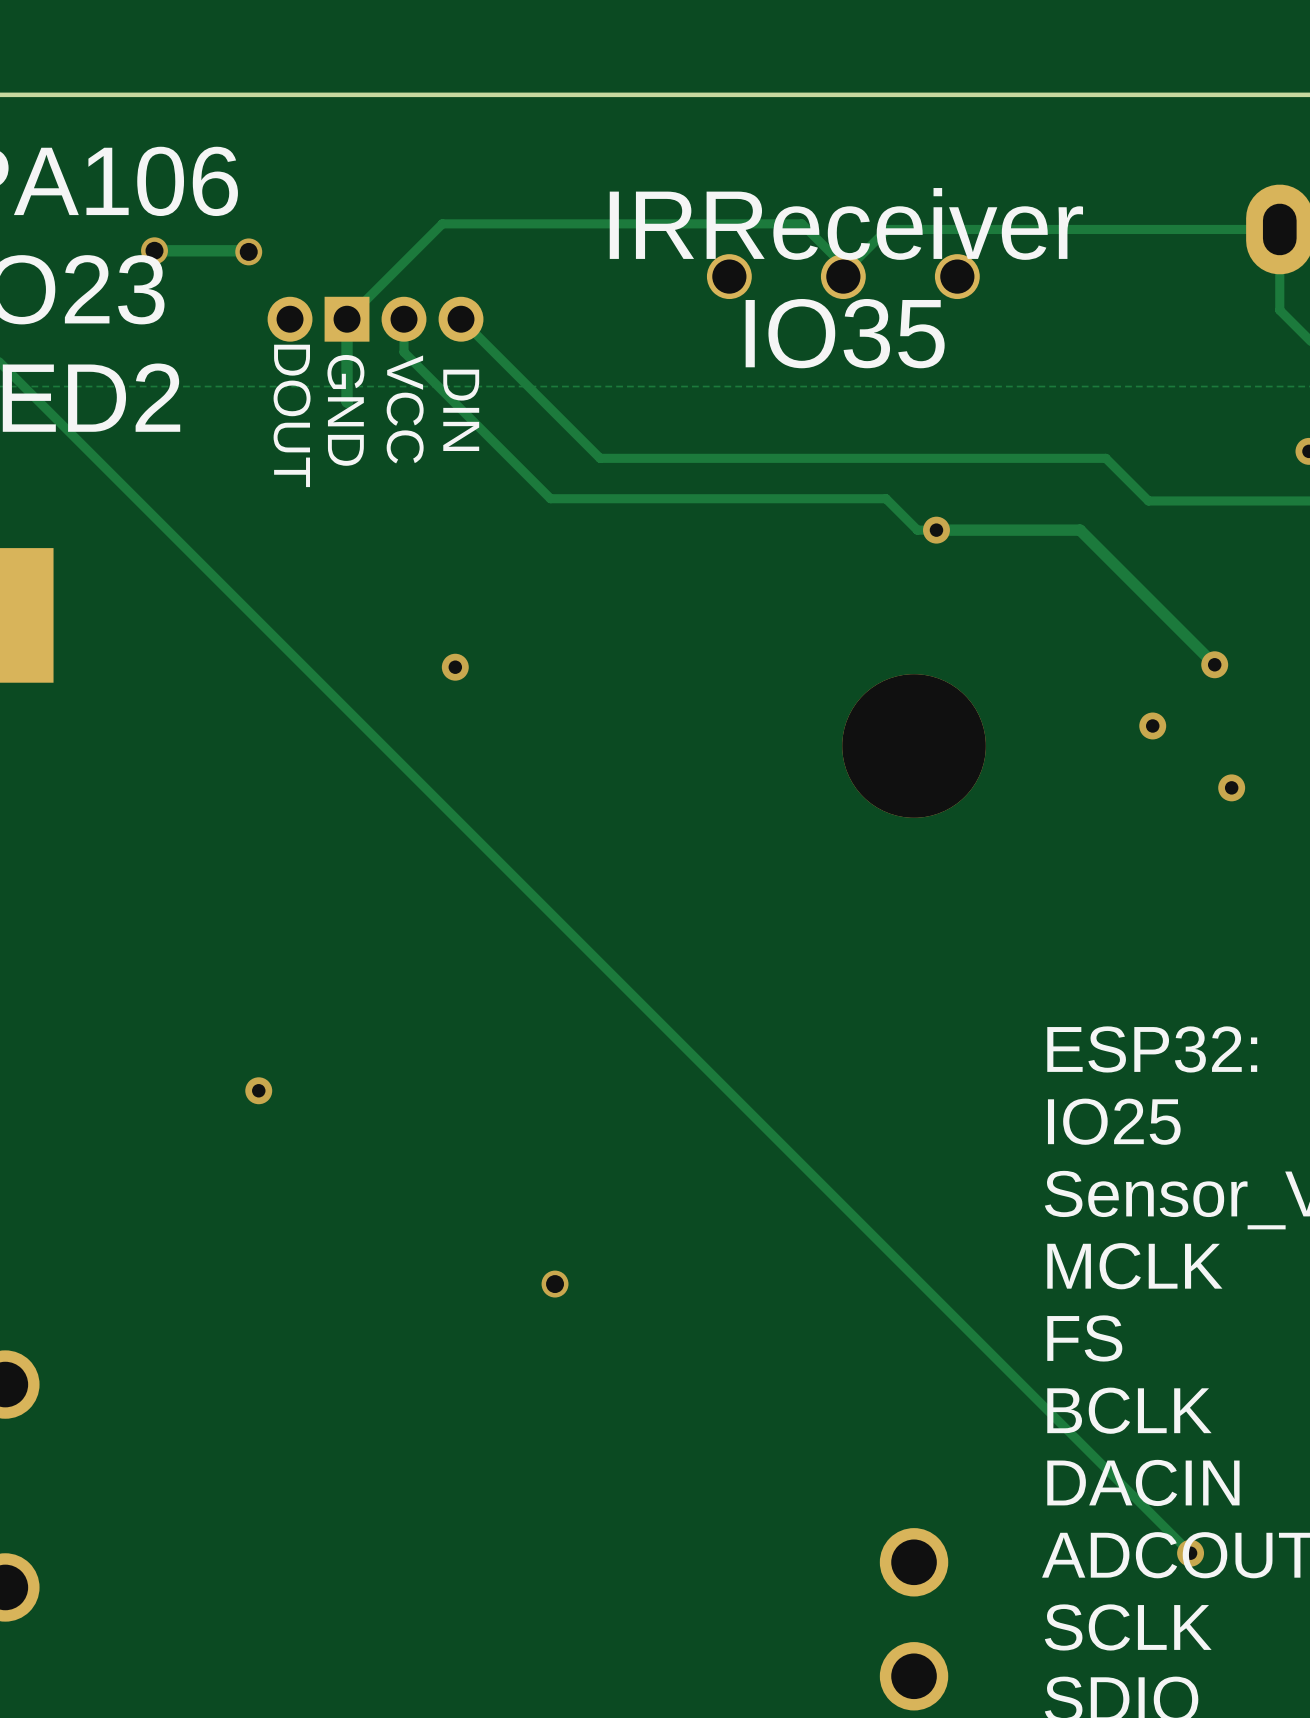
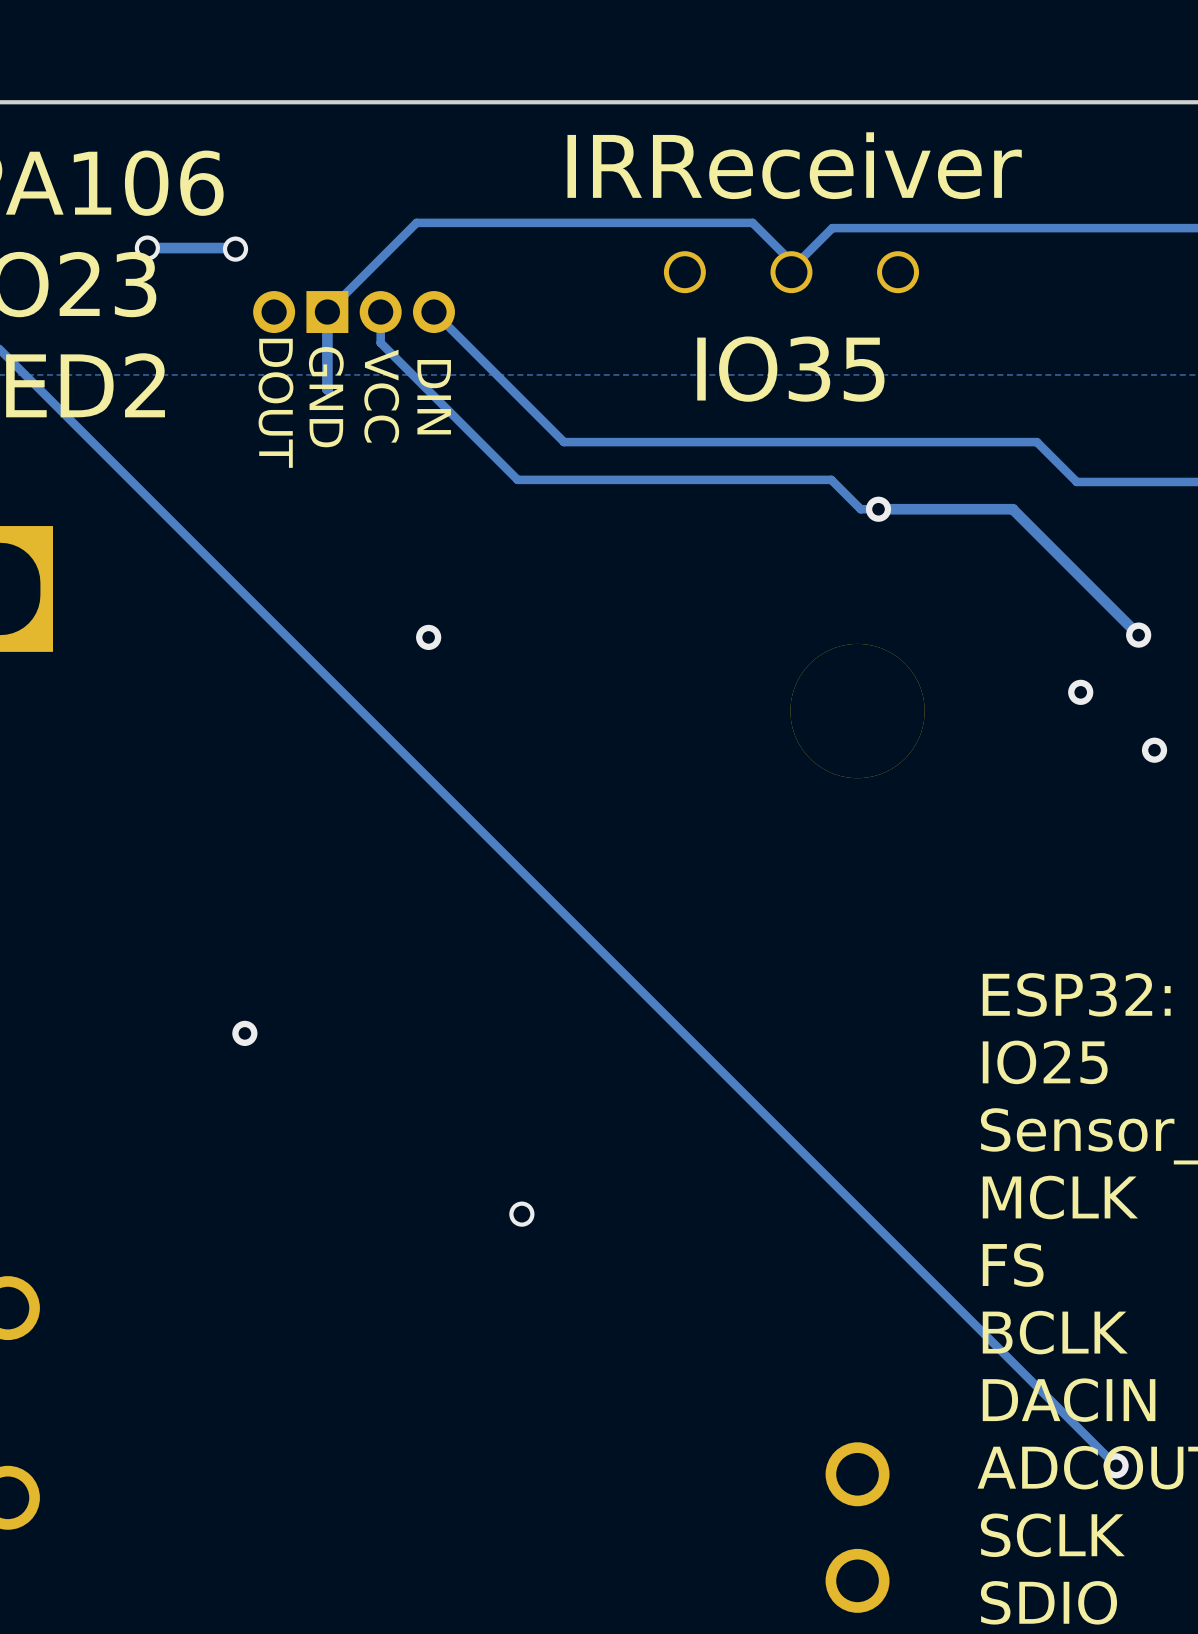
text position: IRReceiver (846, 223) -> IRReceiver (794, 165)
text position: IO35 (845, 333) -> IO35 (790, 369)

